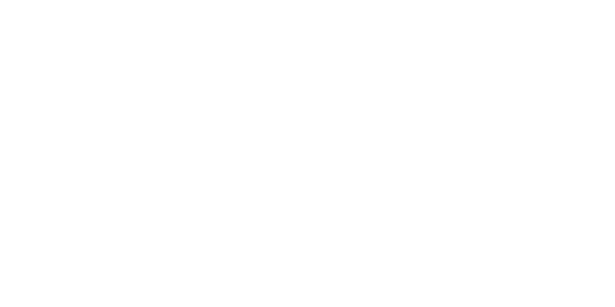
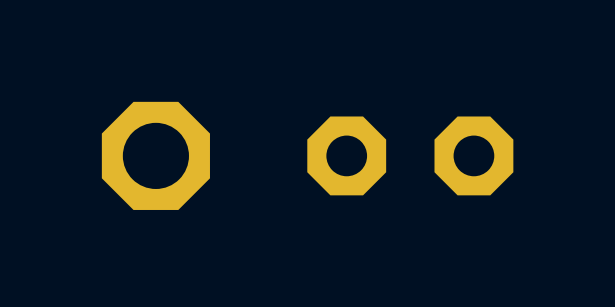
part: none -> (155, 155)
part: none -> (410, 155)

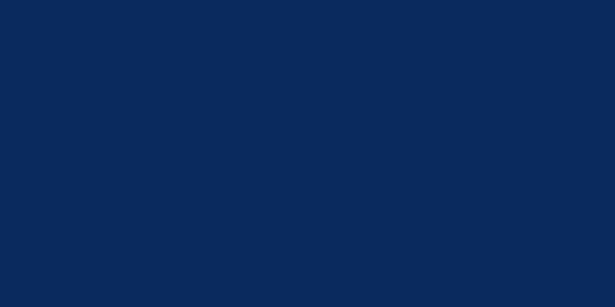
part: (155, 155) -> none
part: (410, 155) -> none

